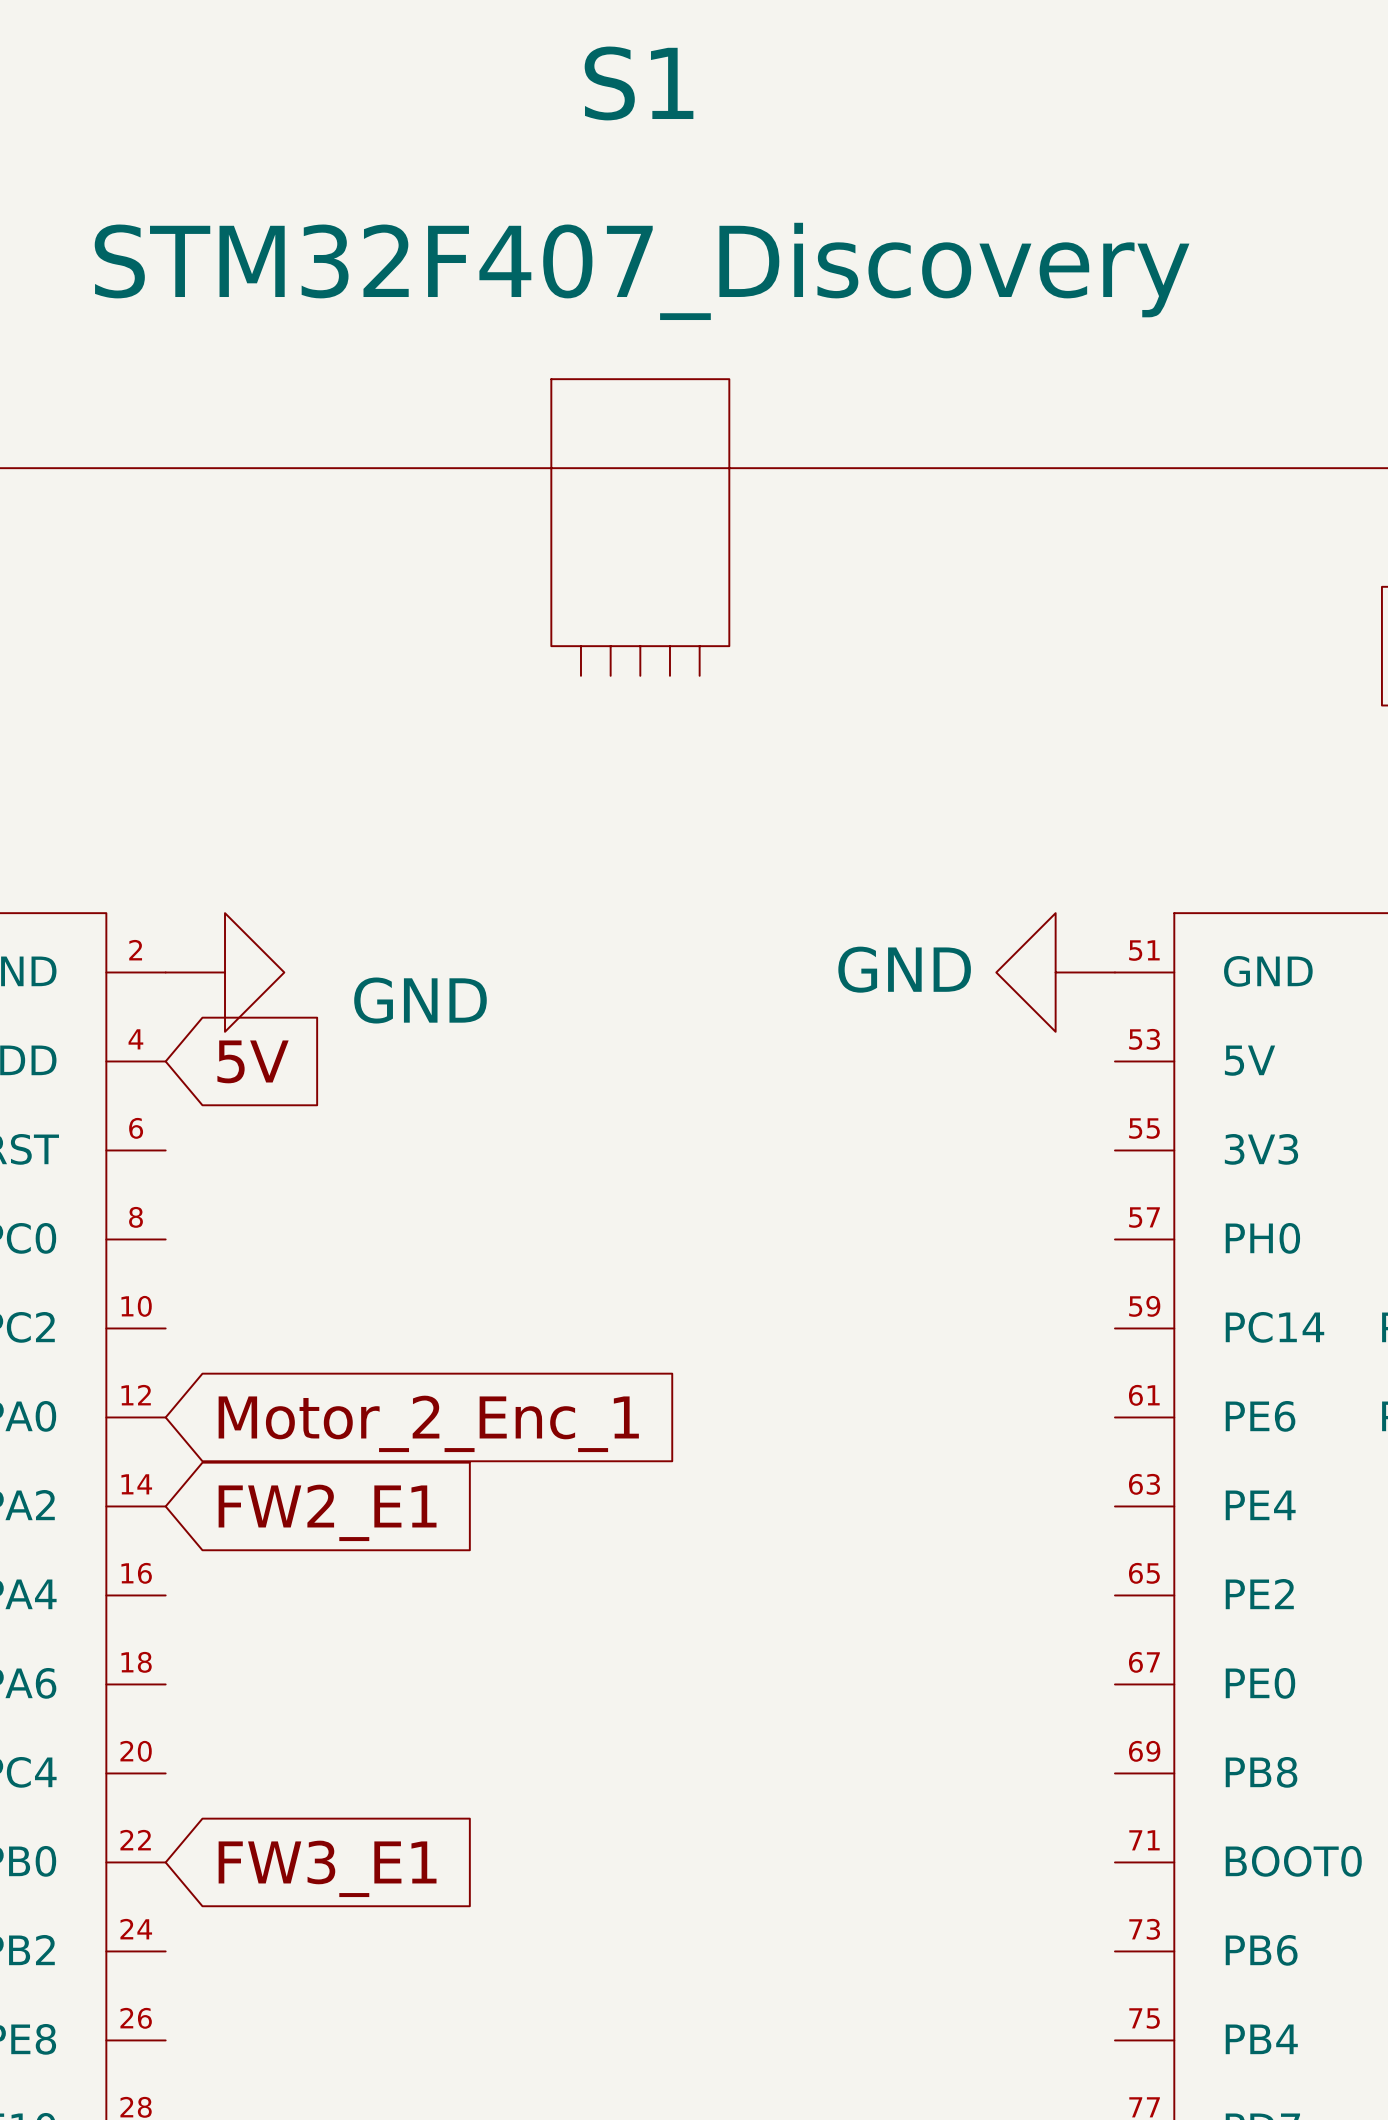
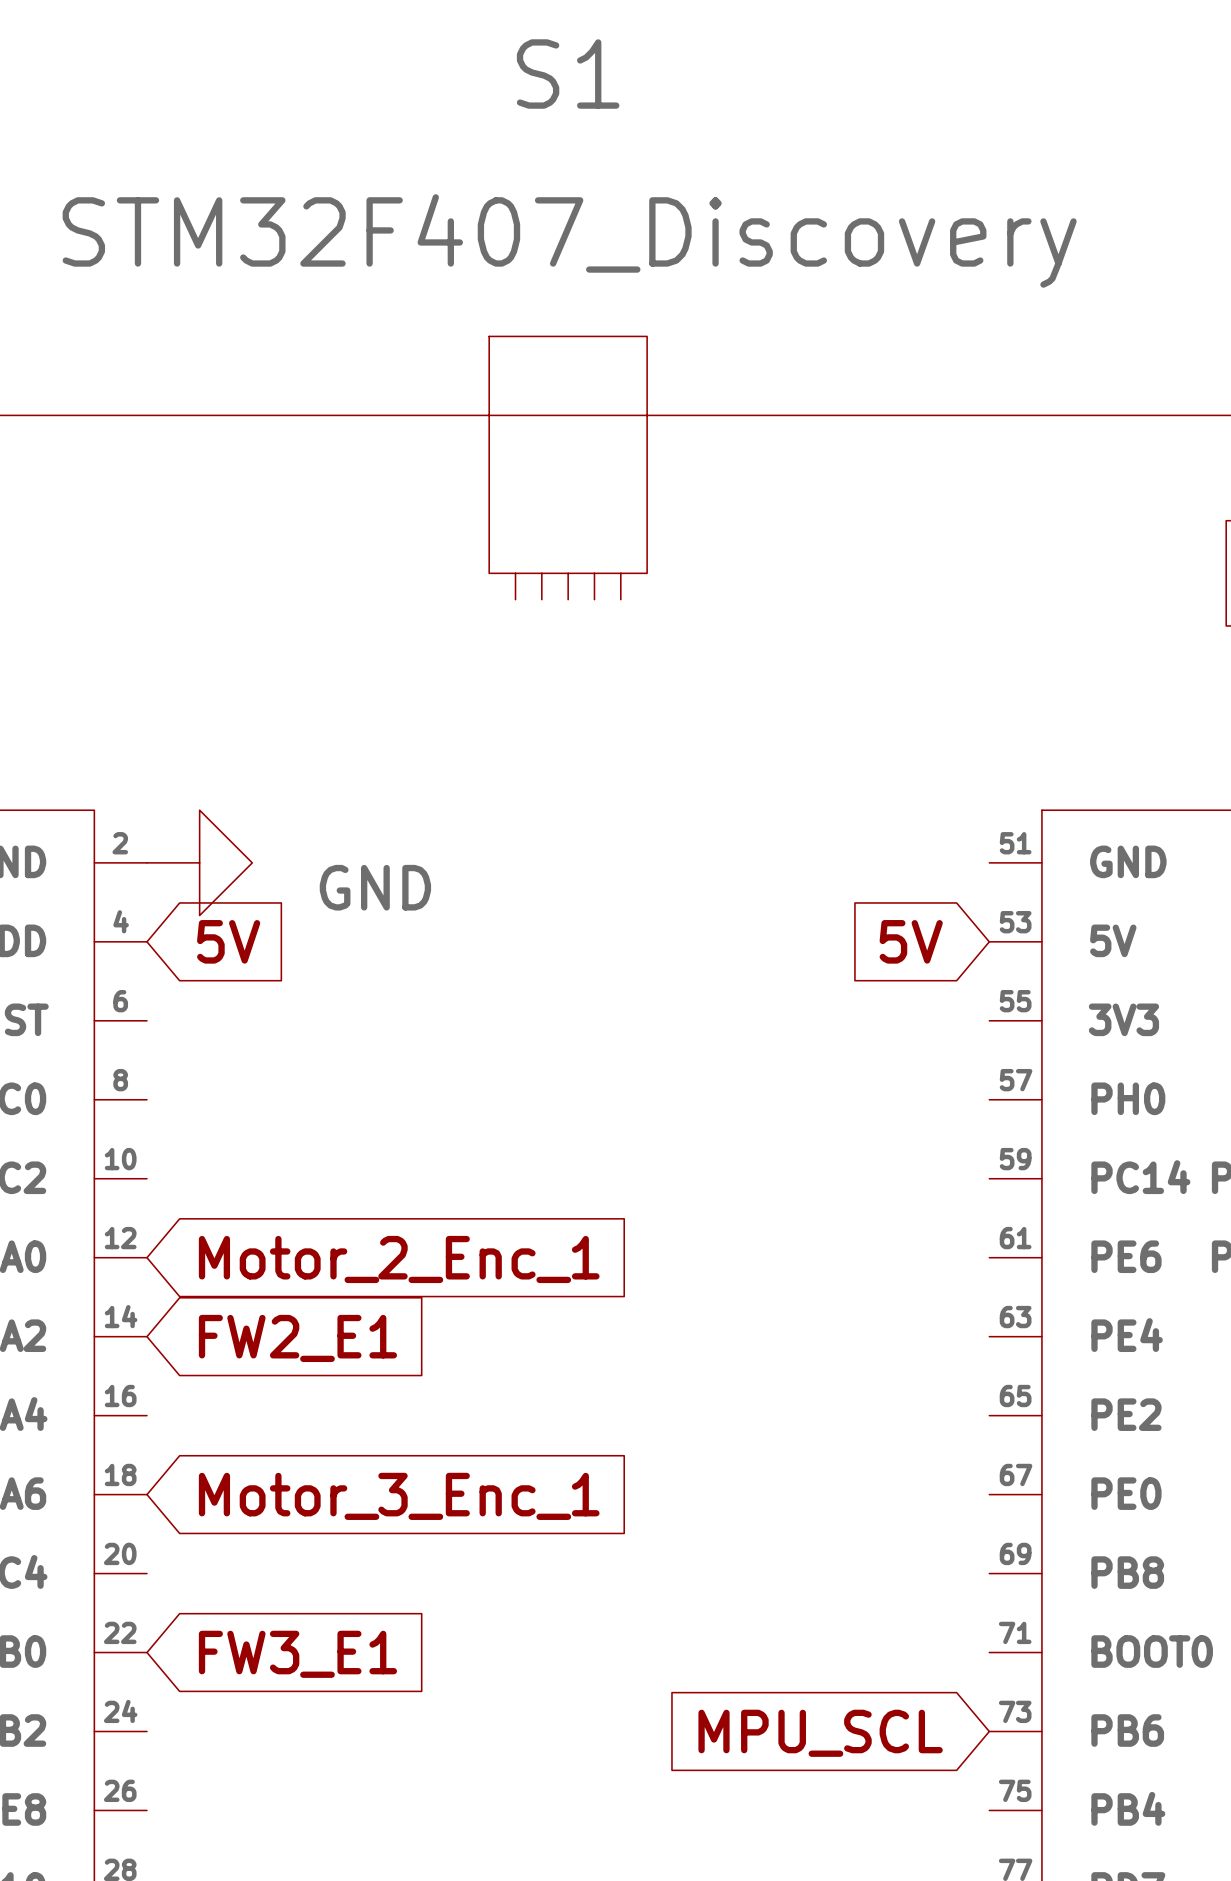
power symbol: GND (1055, 972) -> none
global label: none -> 5V (911, 941)
global label: none -> Motor_3_Enc_1 (399, 1496)
global label: none -> MPU_SCL (820, 1733)

